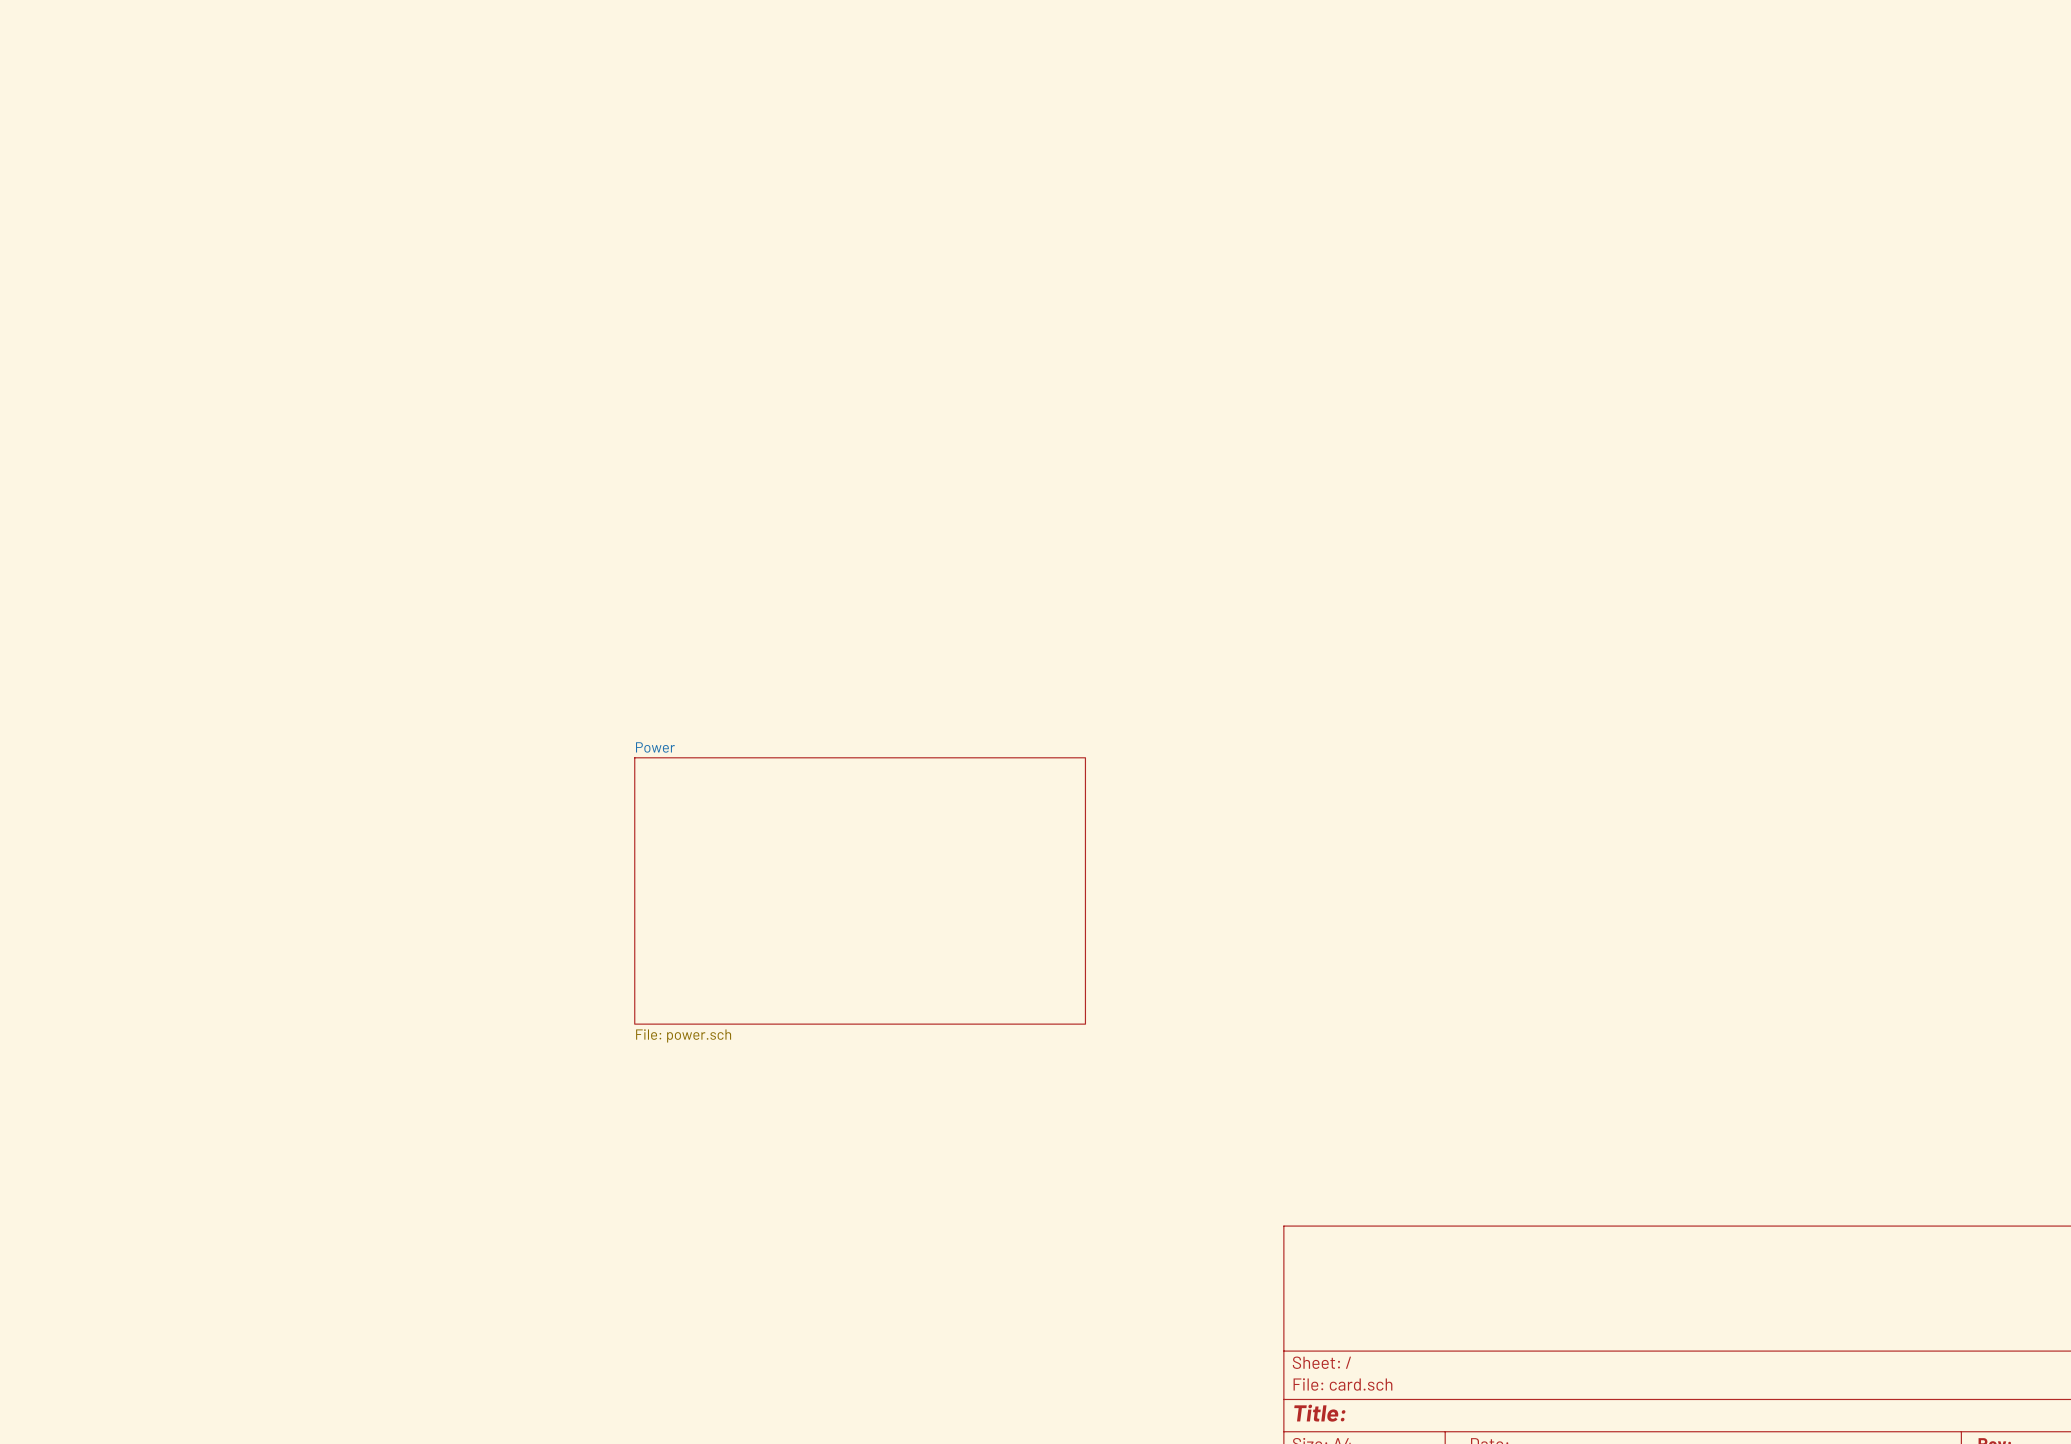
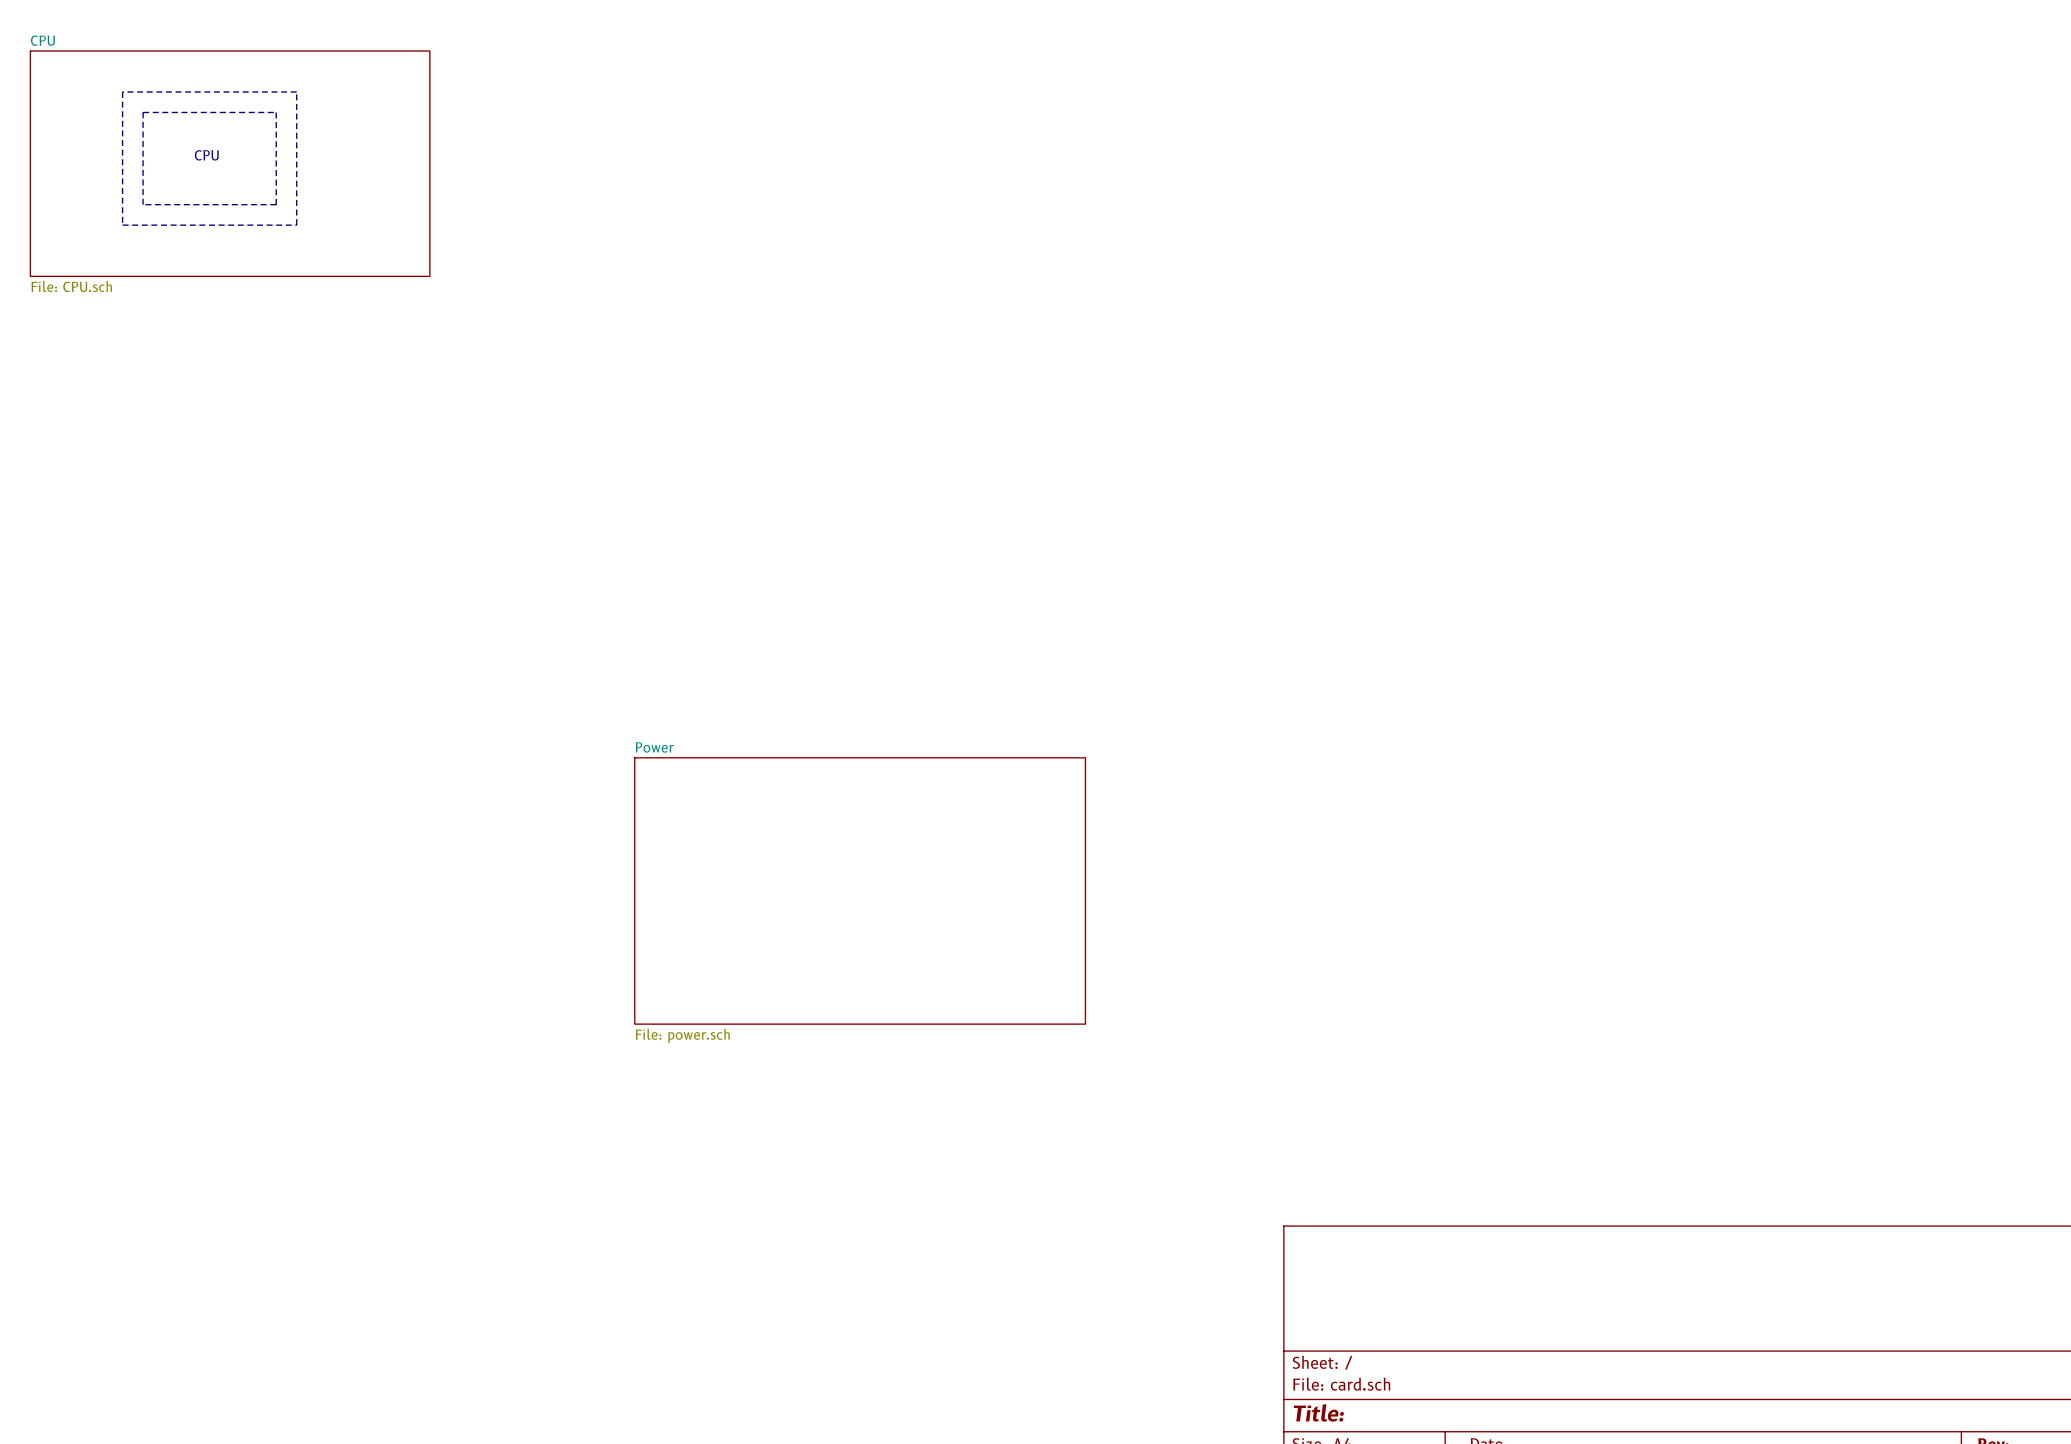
line: none -> (122, 91) (122, 225) (296, 225) (296, 91) (122, 91)
line: none -> (143, 112) (276, 112) (276, 204) (143, 204) (143, 112)
text: none -> CPU (206, 155)
sheet CPU: none -> File: CPU.sch (230, 163)

